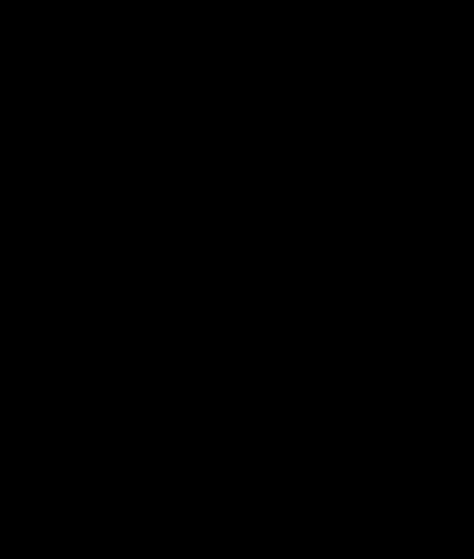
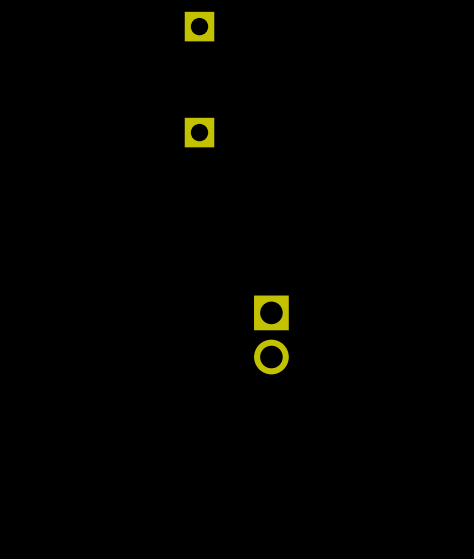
part: none -> (199, 26)
part: none -> (199, 132)
part: none -> (271, 334)

